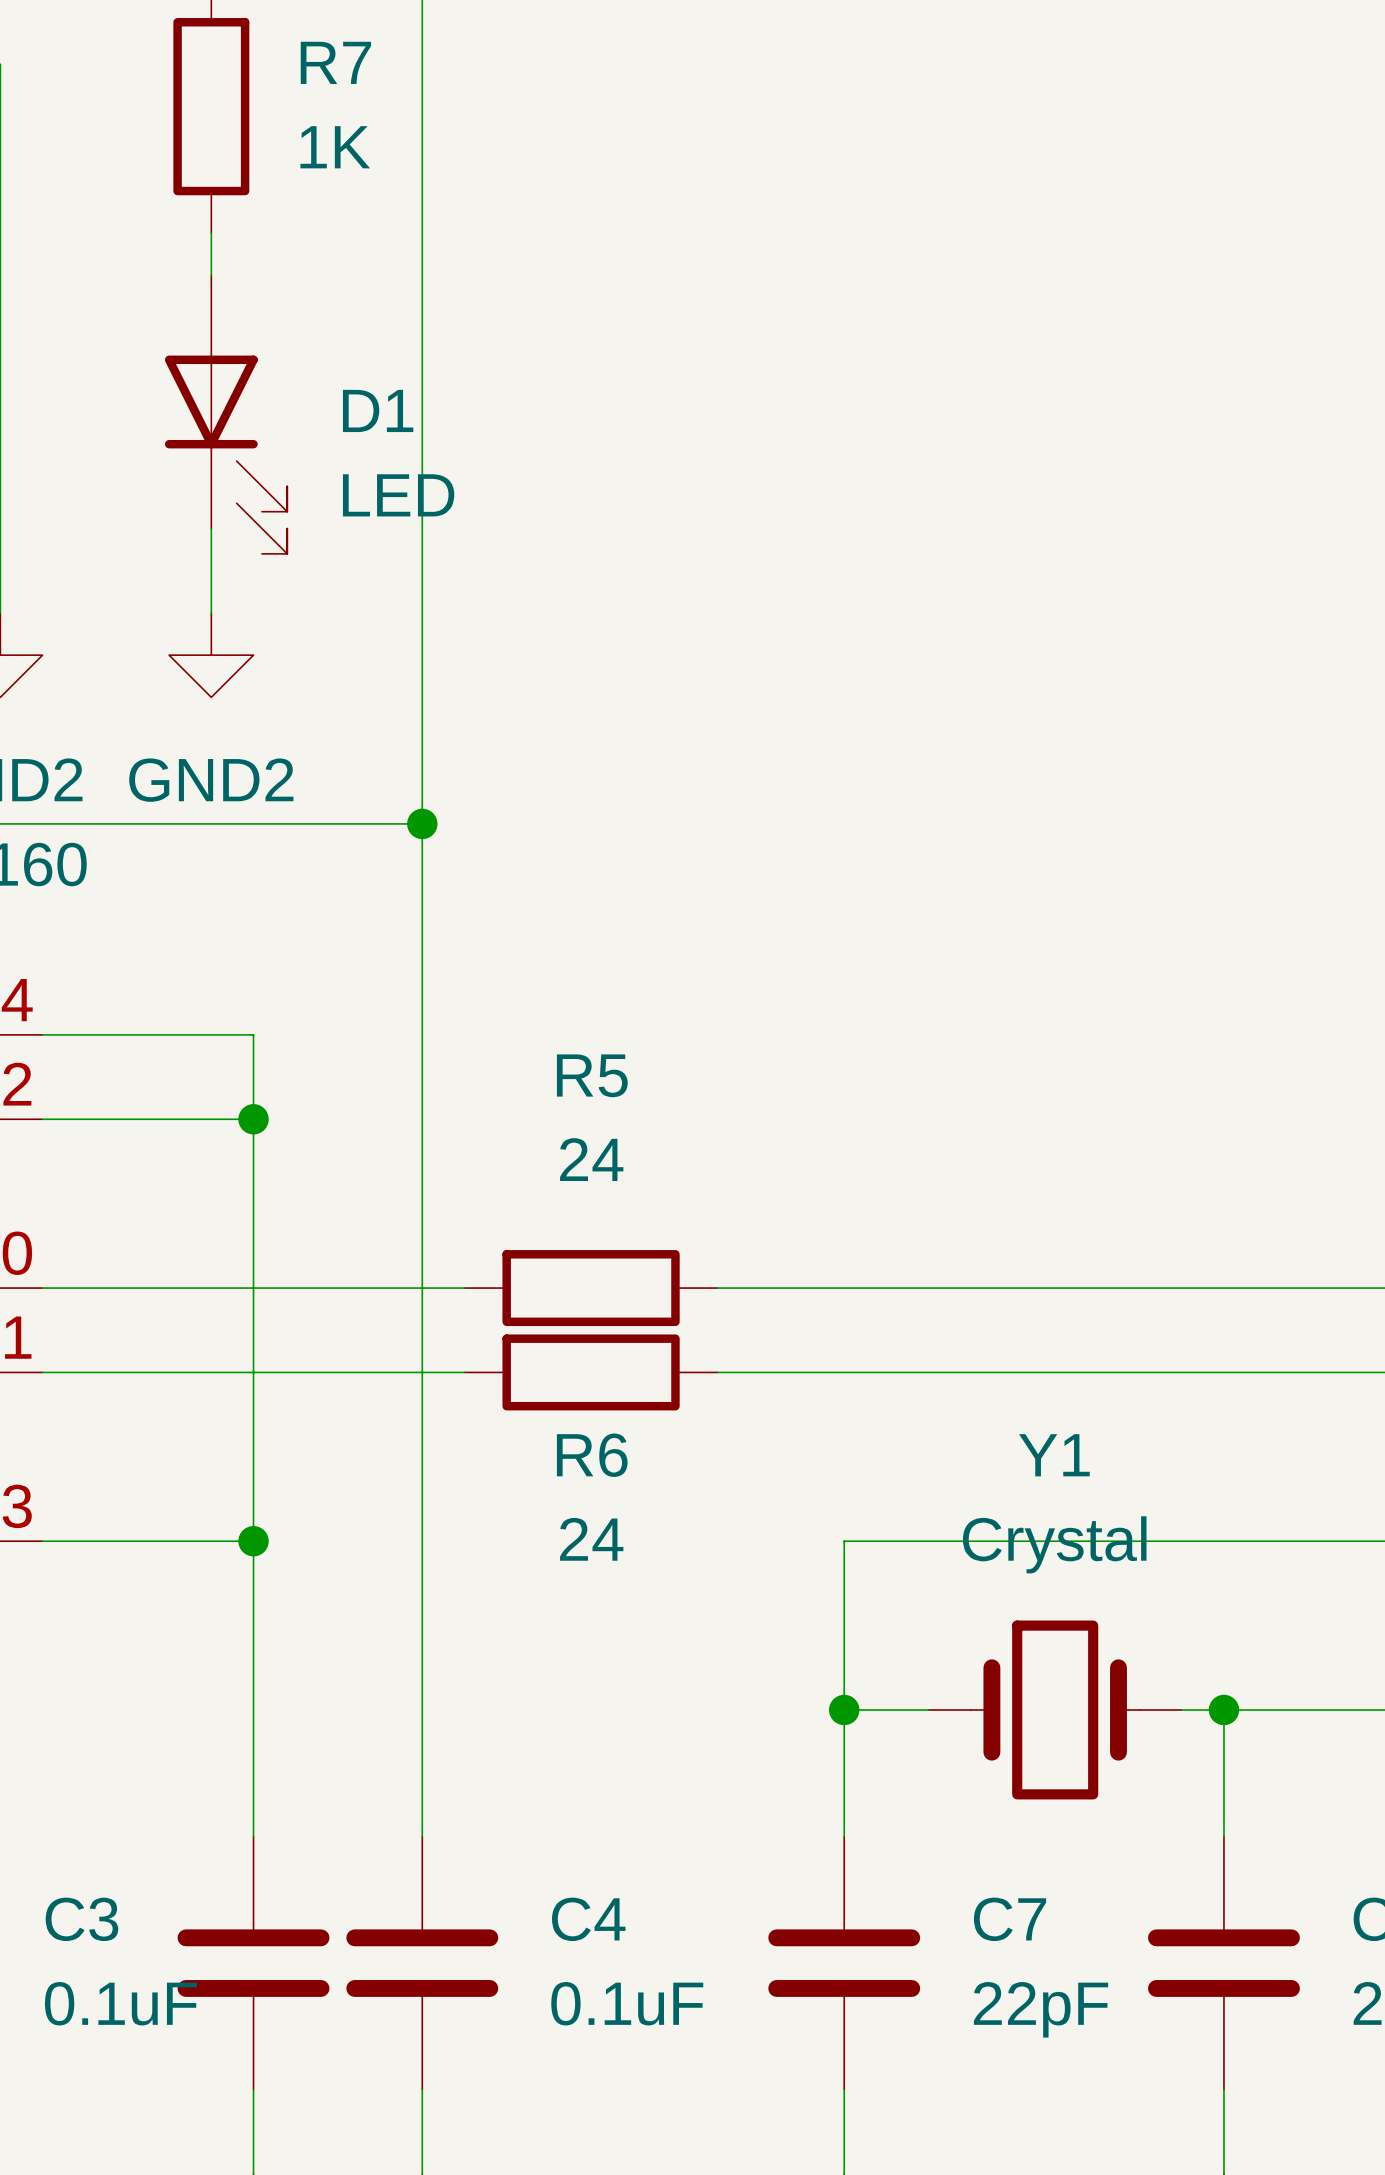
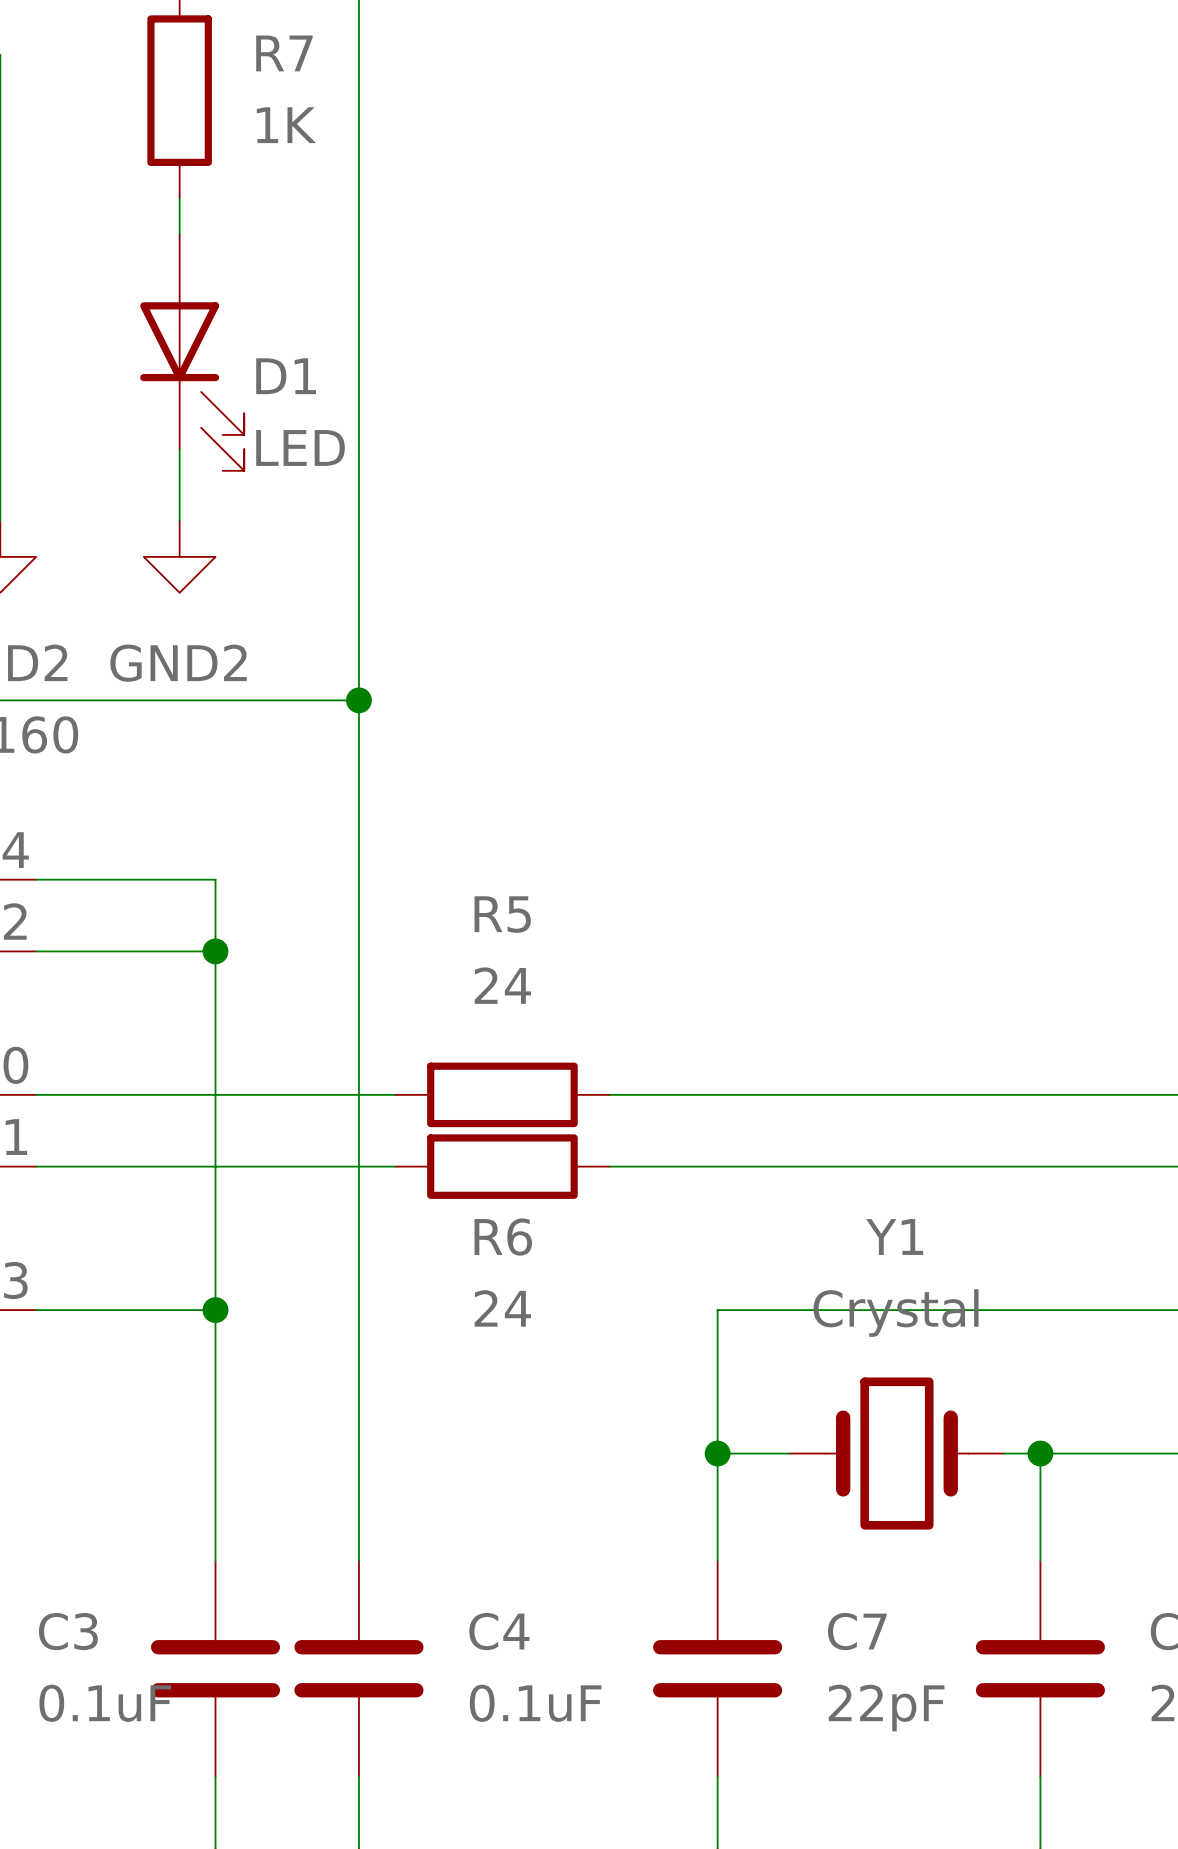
D1 name position: D1 (378, 410) -> D1 (286, 376)
D1 value position: LED (398, 495) -> LED (300, 447)

